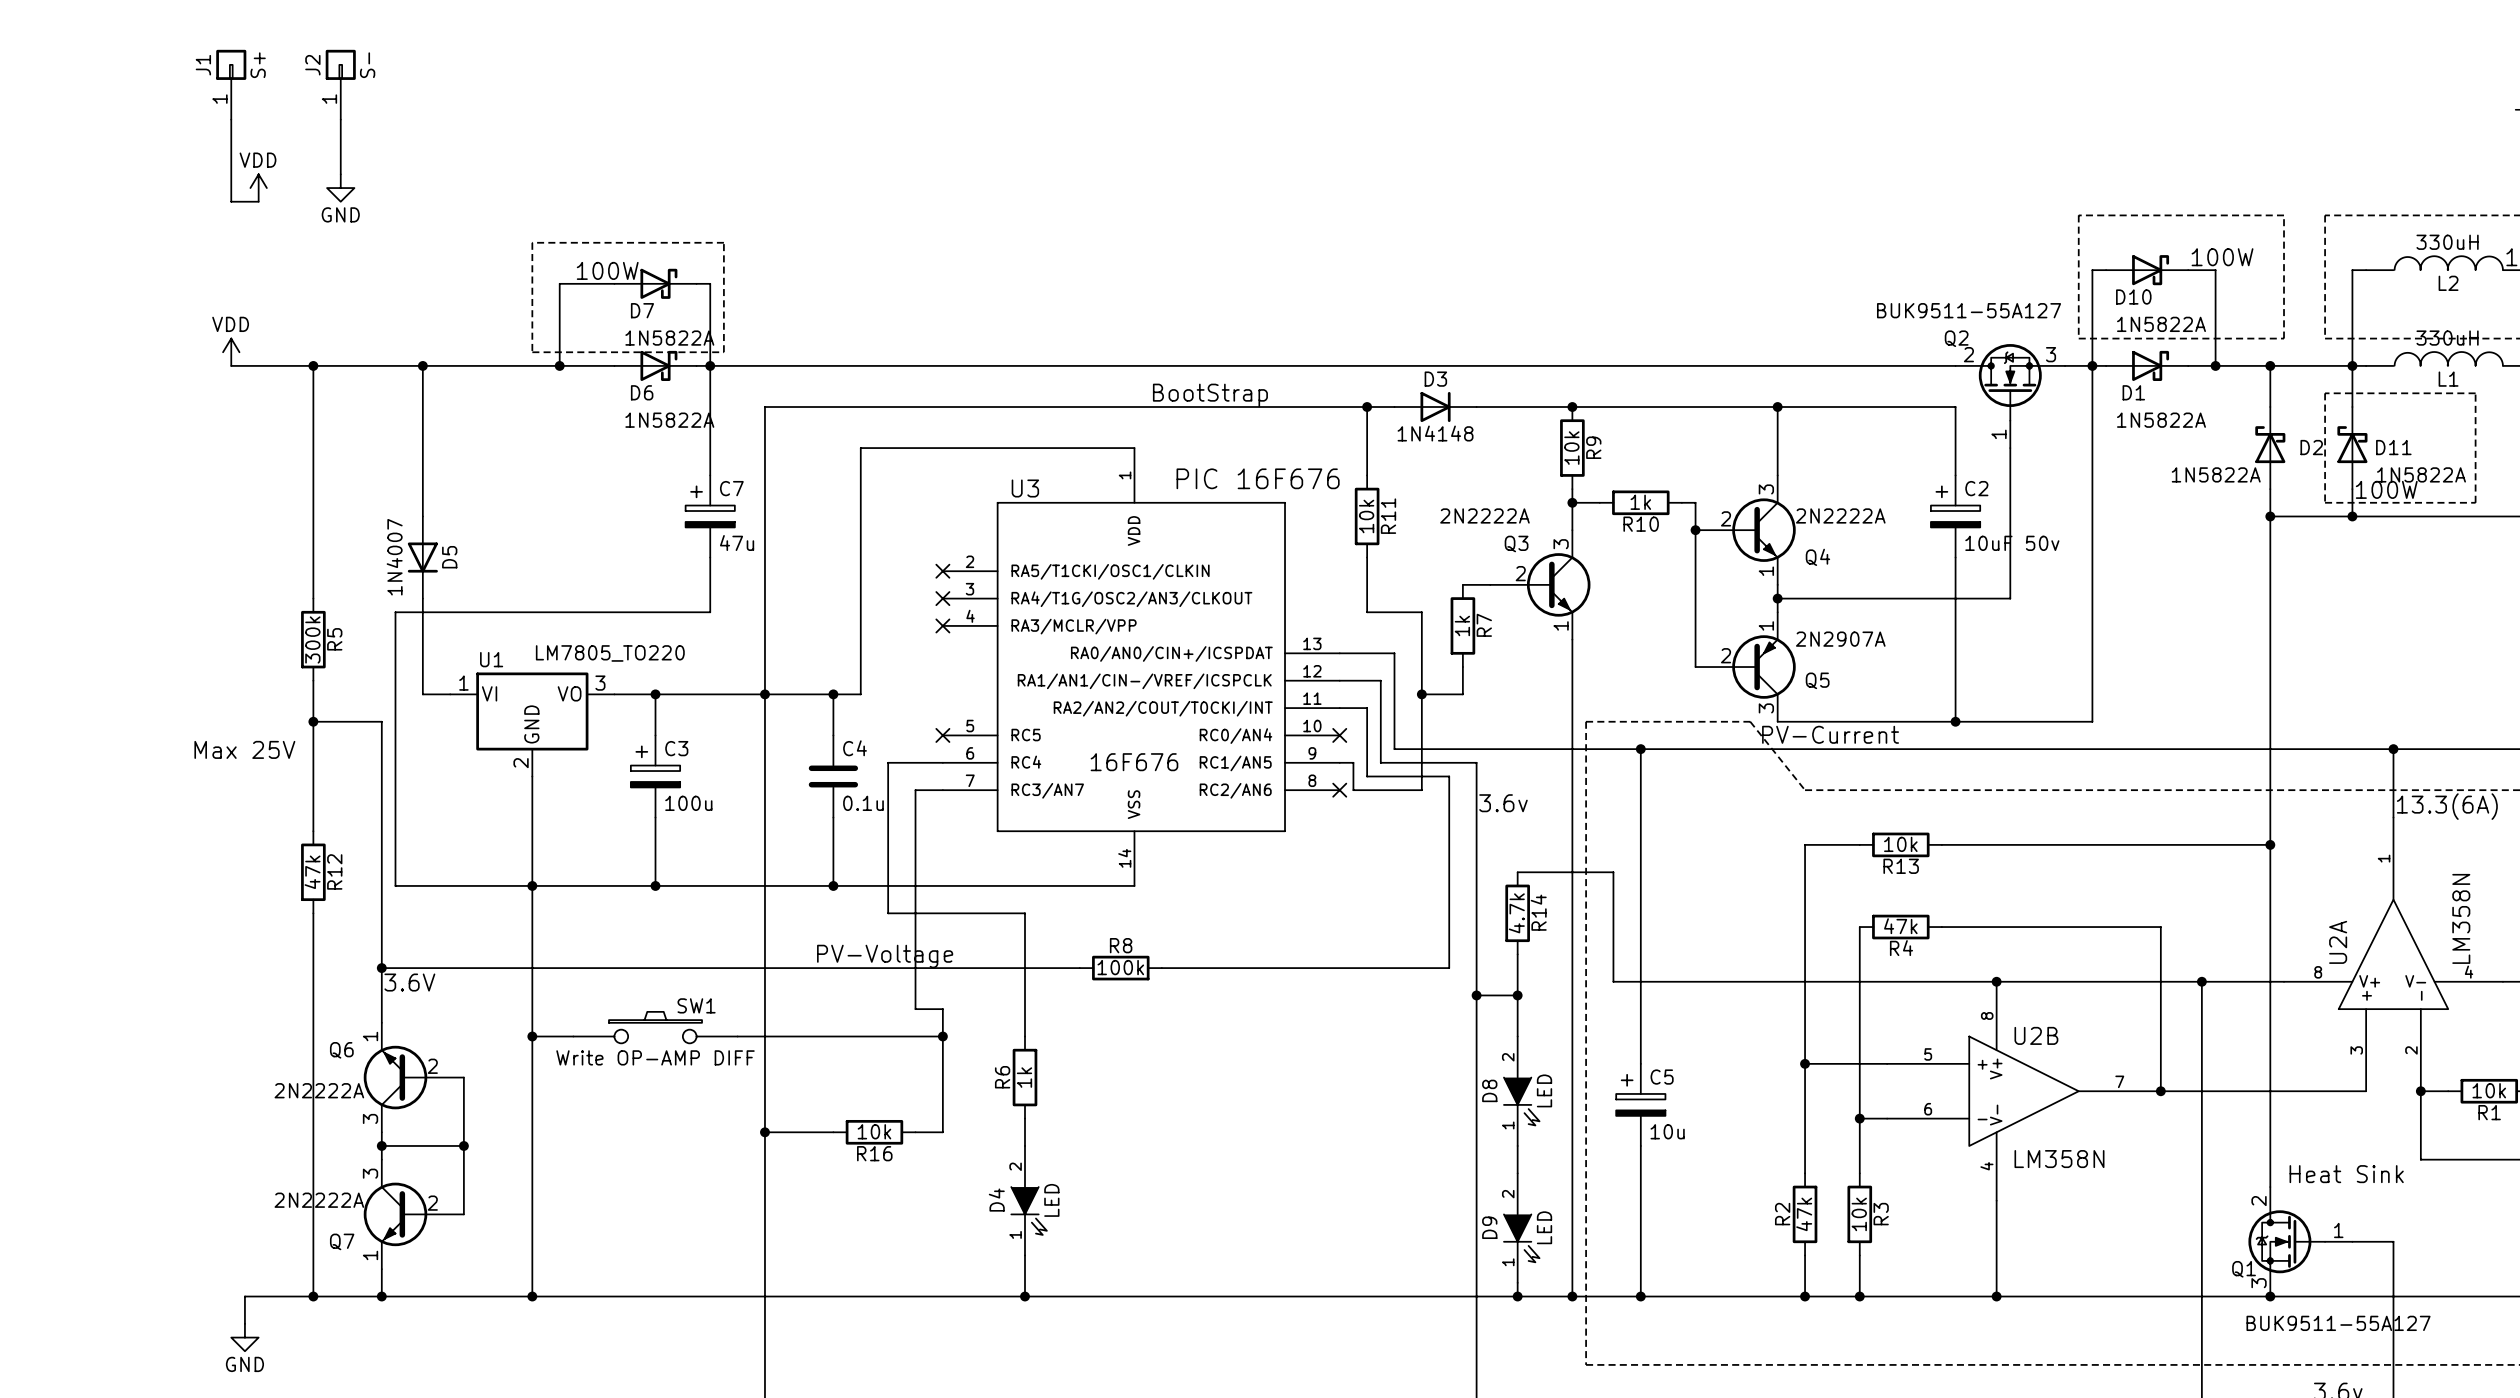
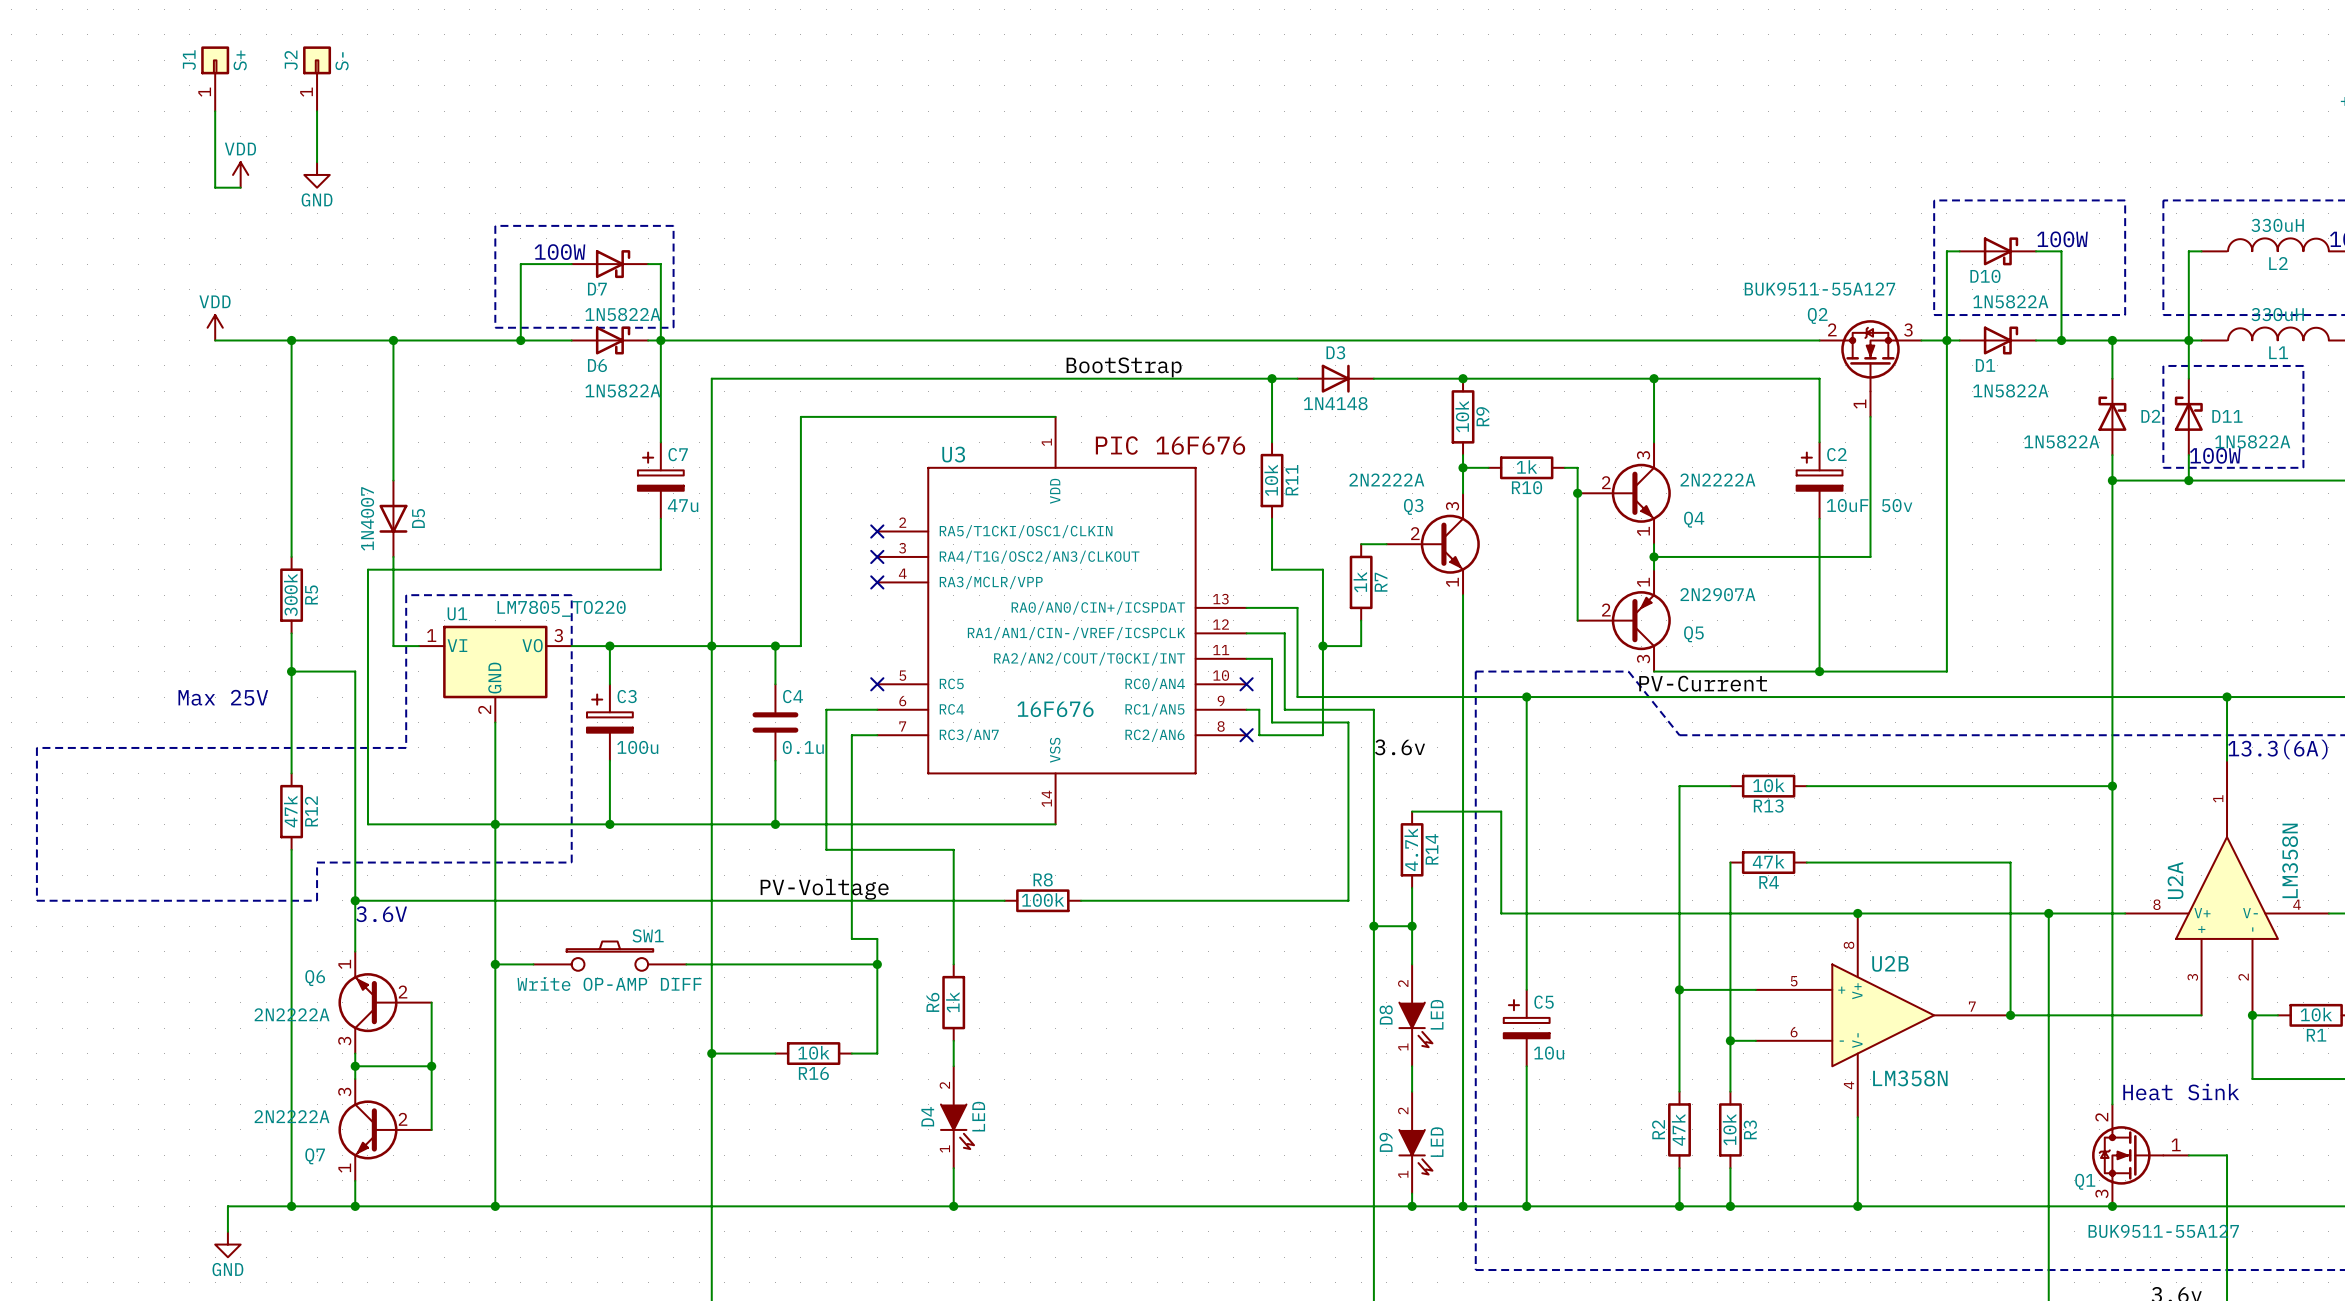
line: none -> (406, 595) (571, 595) (571, 862) (317, 862) (317, 900) (36, 900) (36, 747) (406, 747) (406, 595)

